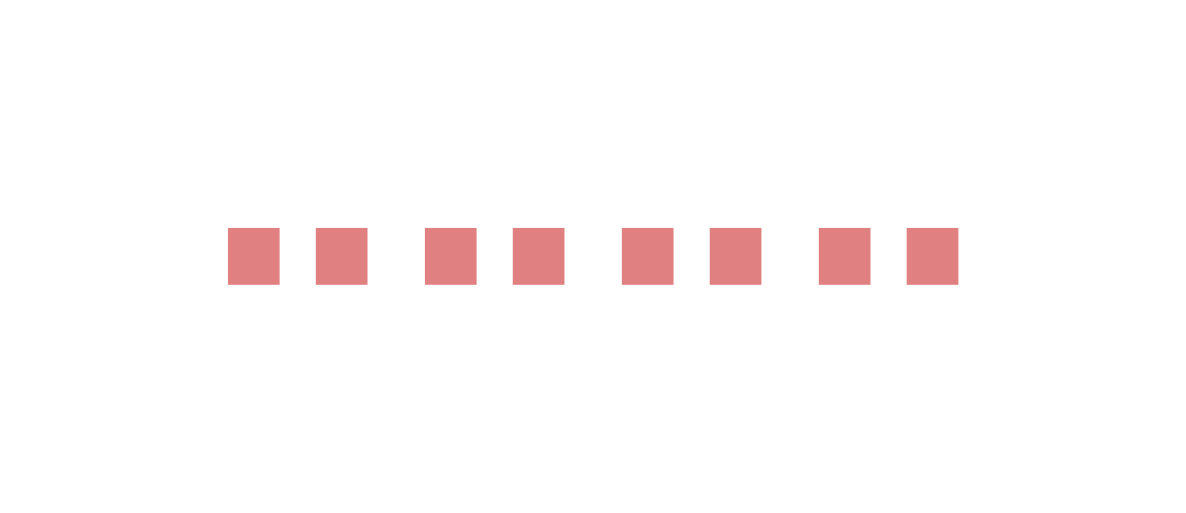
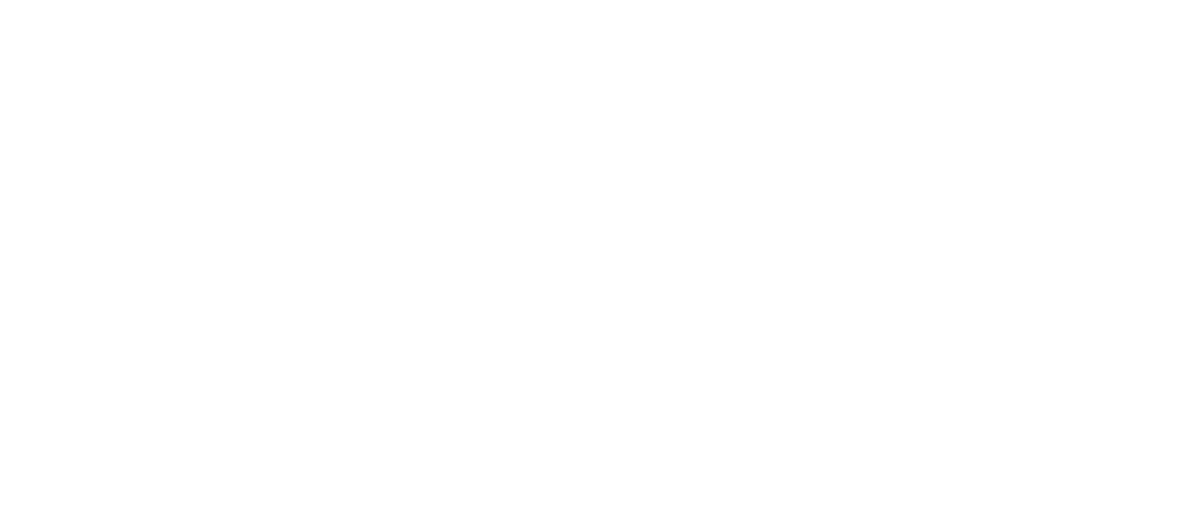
part: (297, 256) -> none
part: (494, 256) -> none
part: (691, 256) -> none
part: (888, 256) -> none

